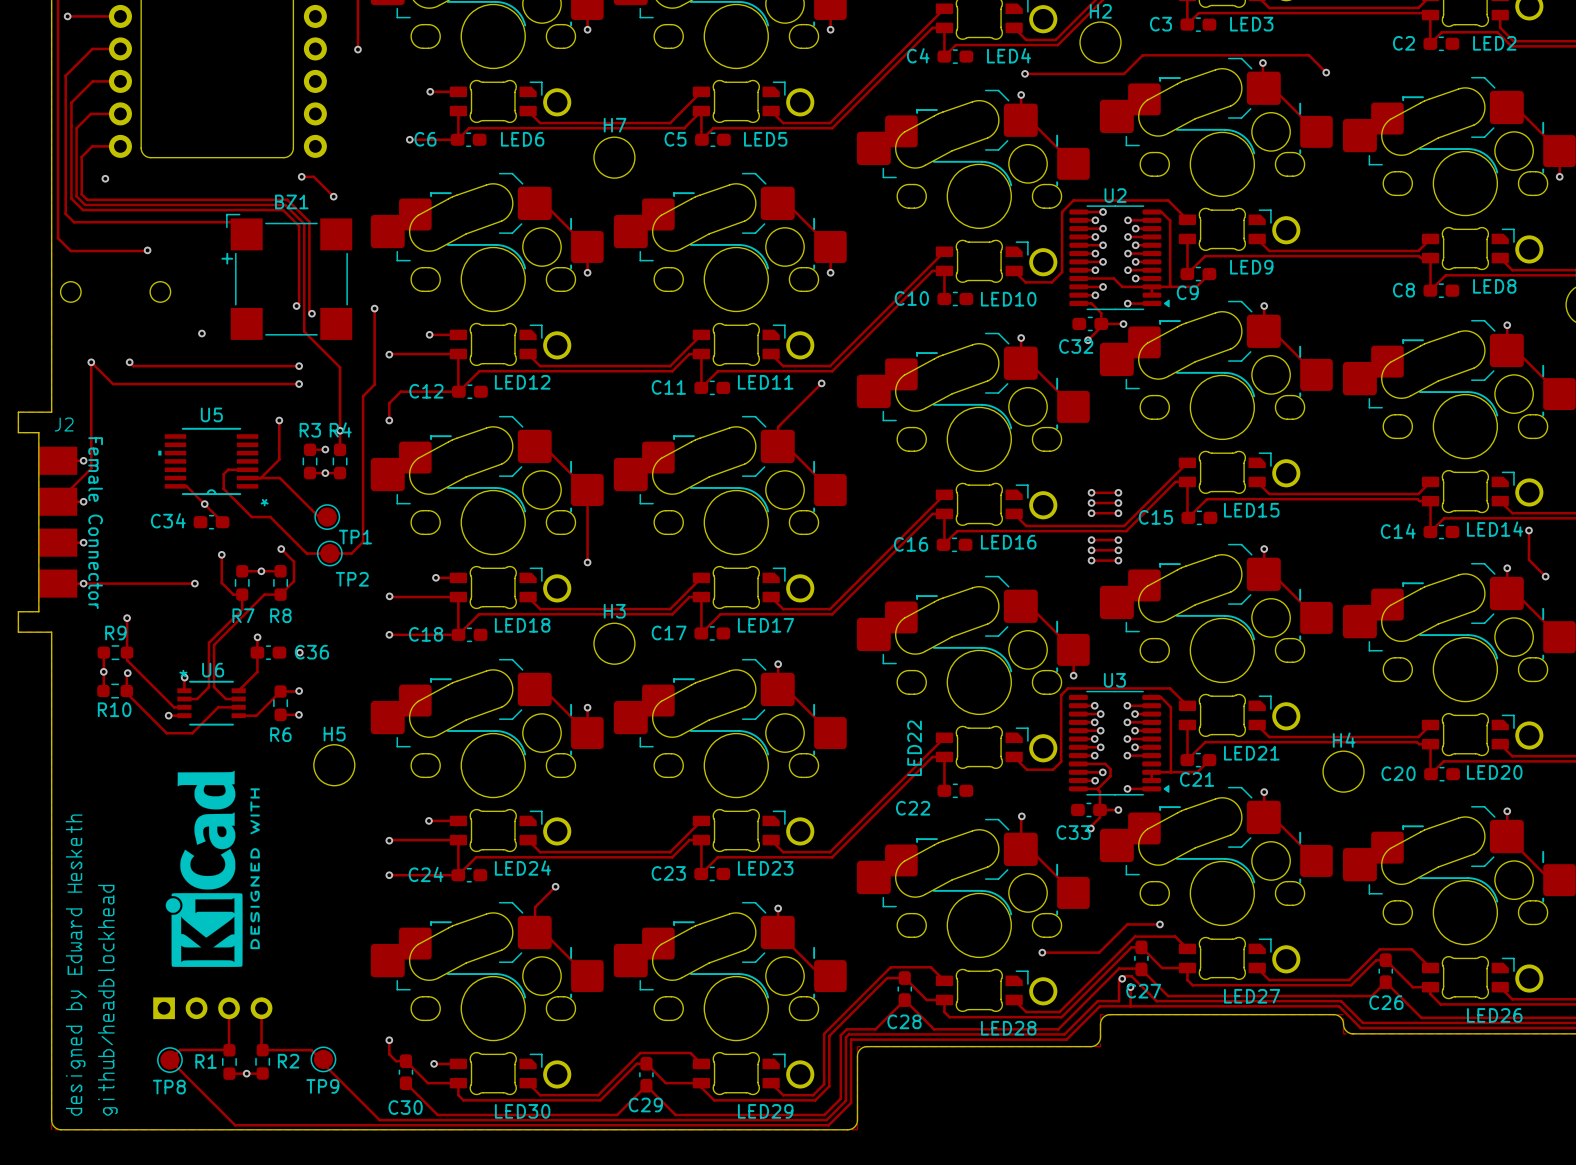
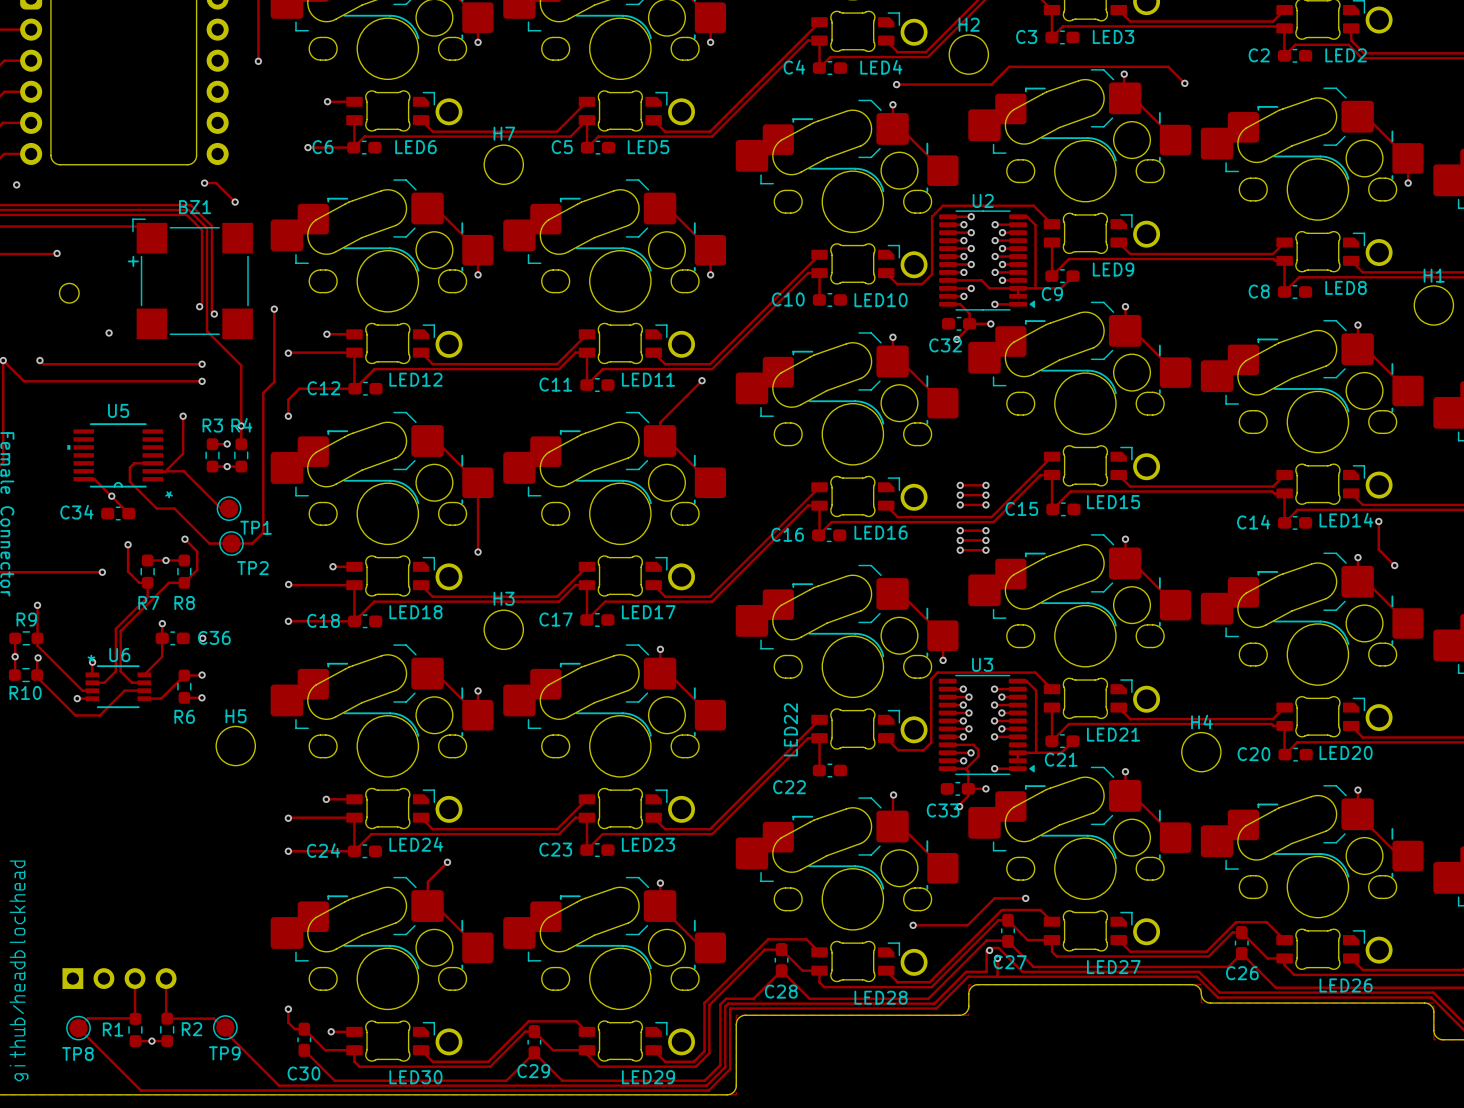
drawing: [165, 770, 260, 967] -> none

